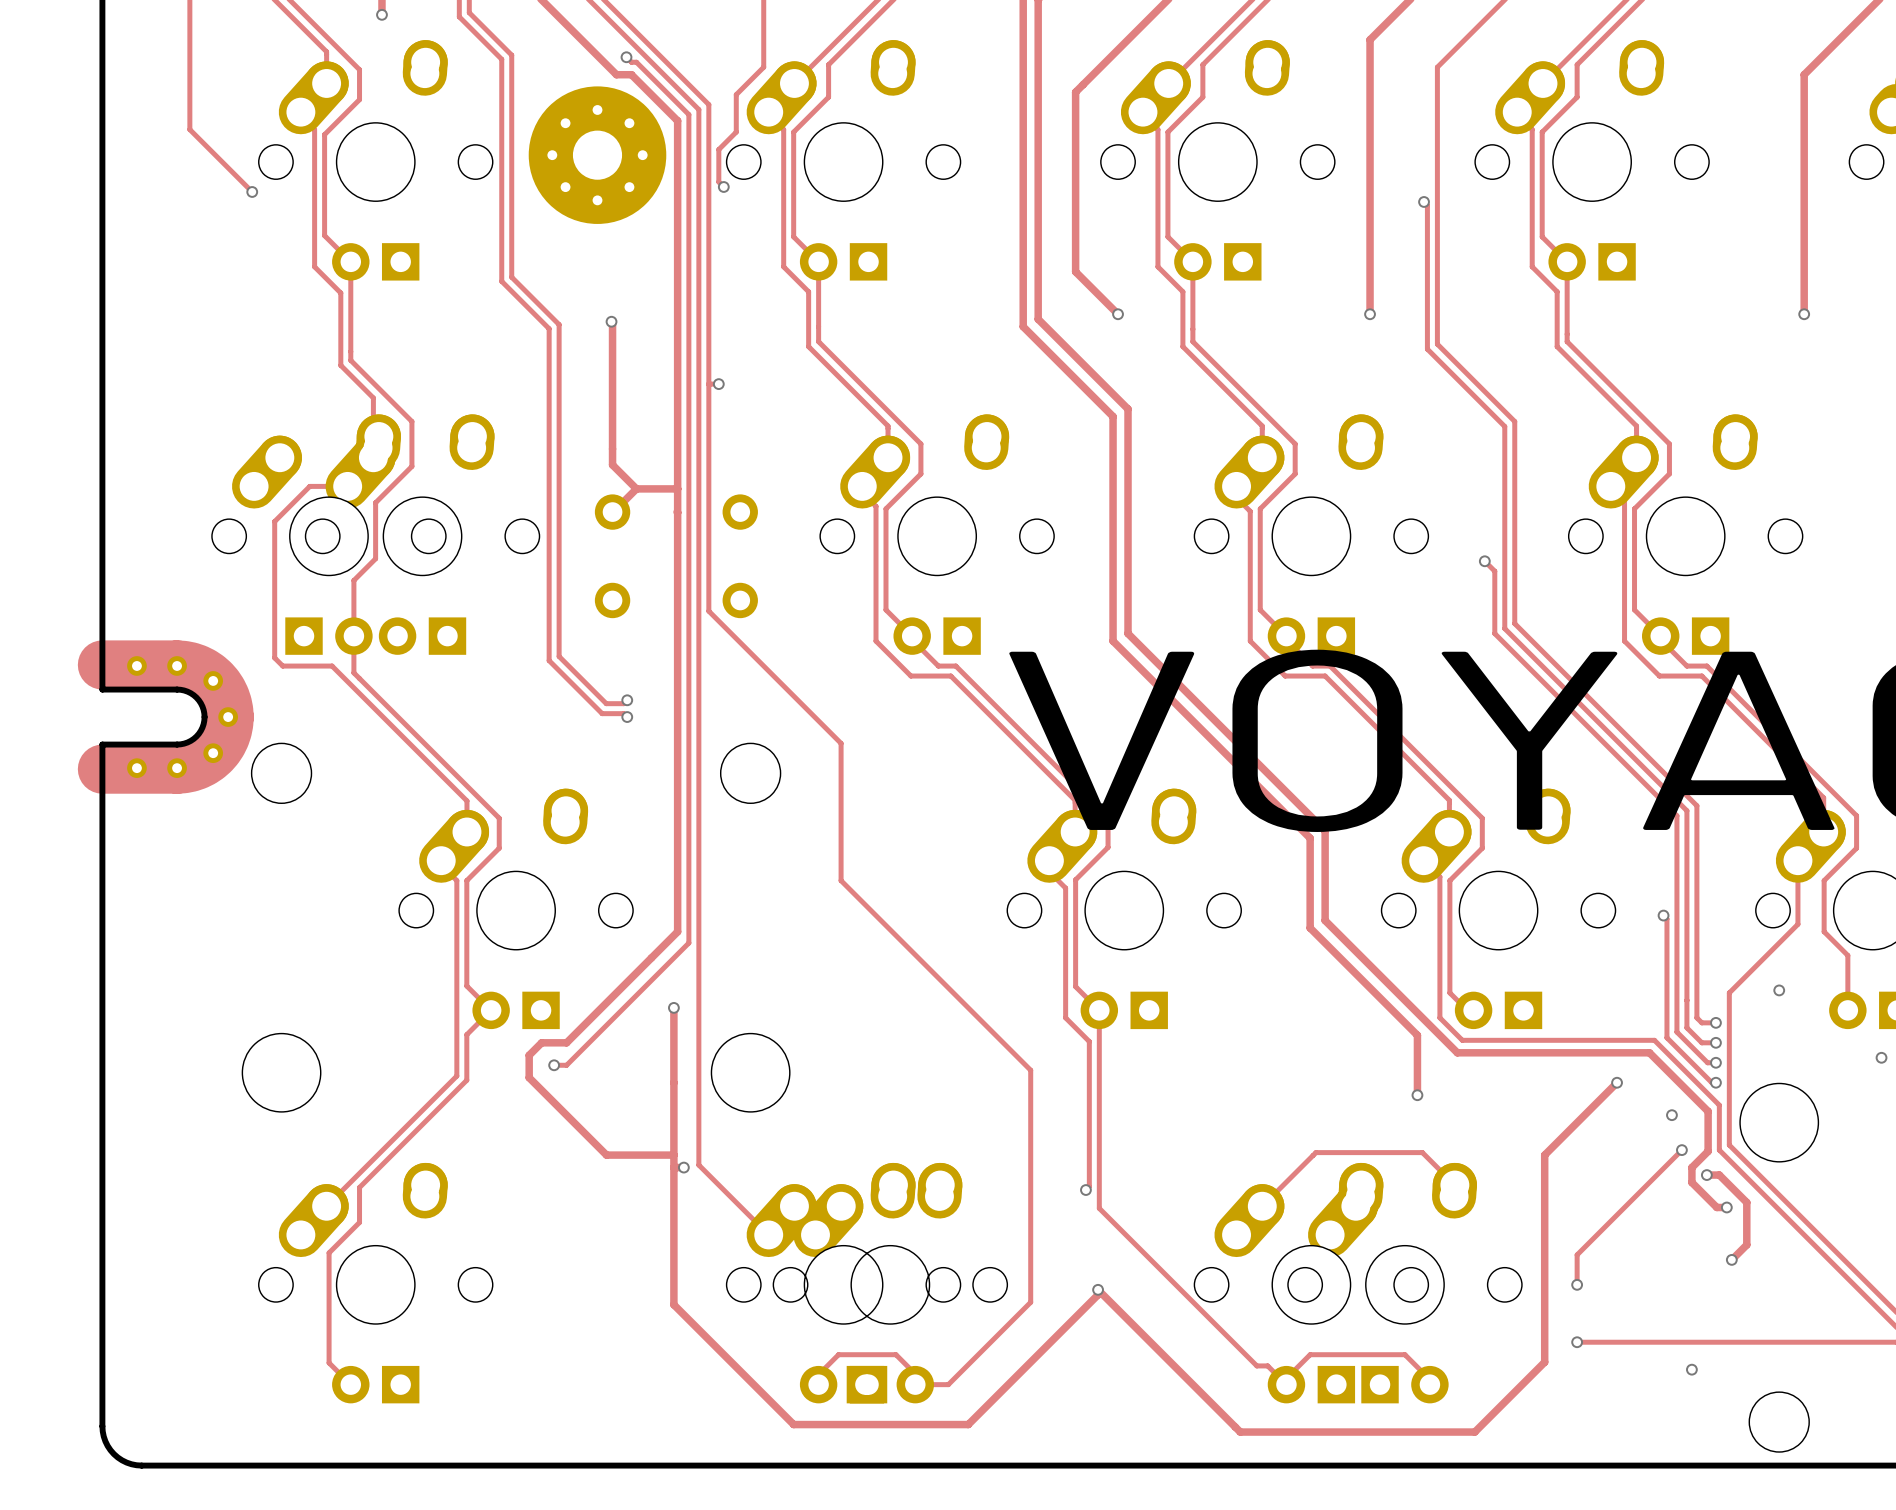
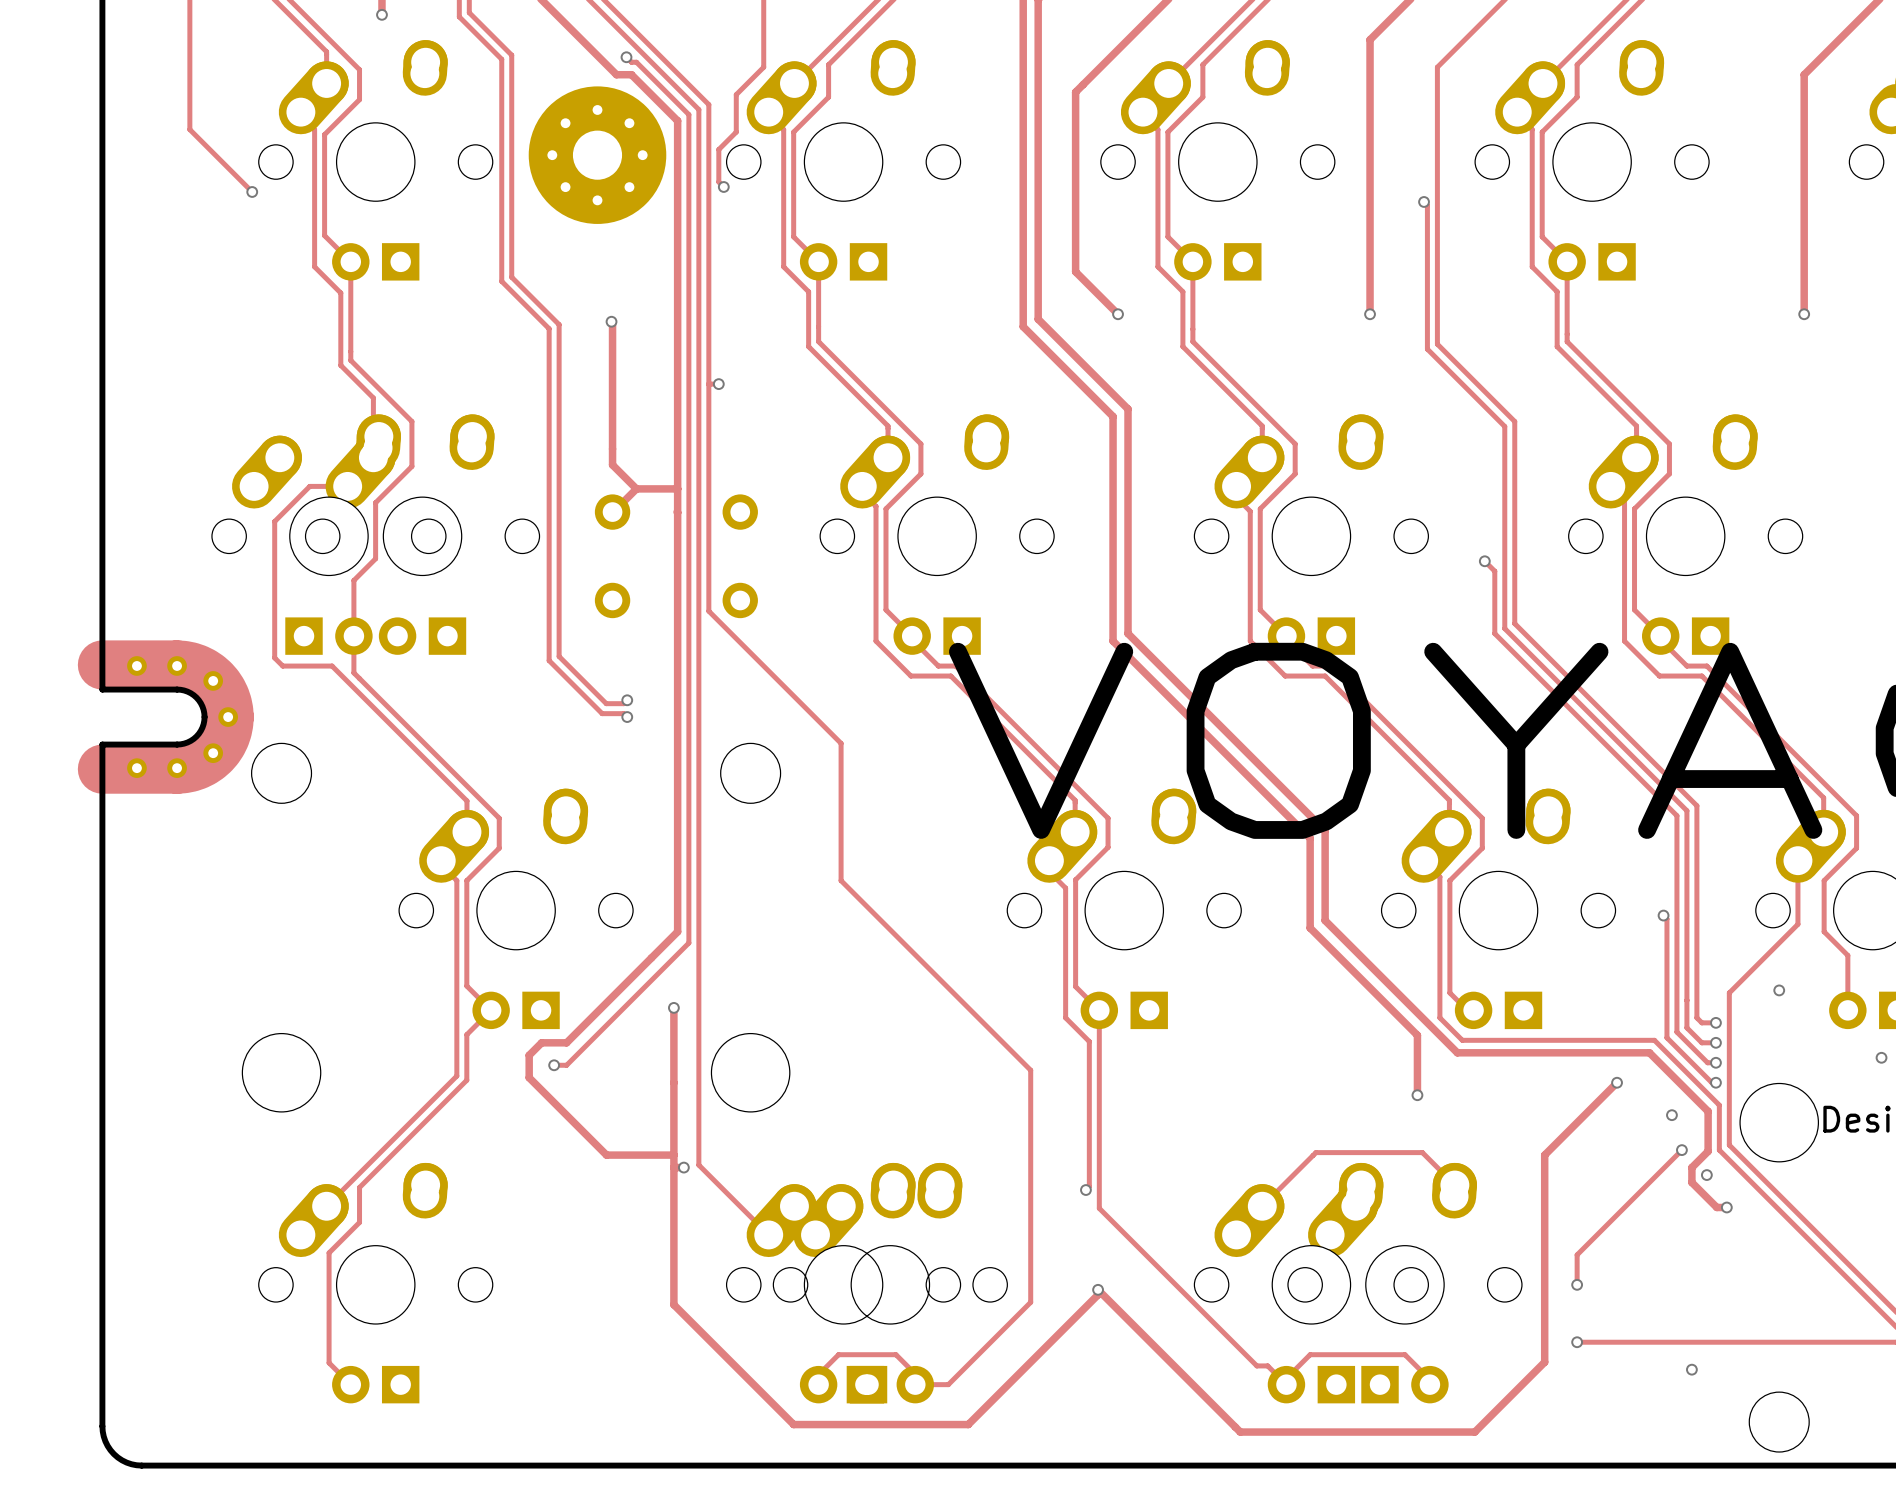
track: (1706, 1175) (1719, 1175) (1746, 1202) (1746, 1244) (1731, 1259) -> none
via: (1731, 1259) -> none

